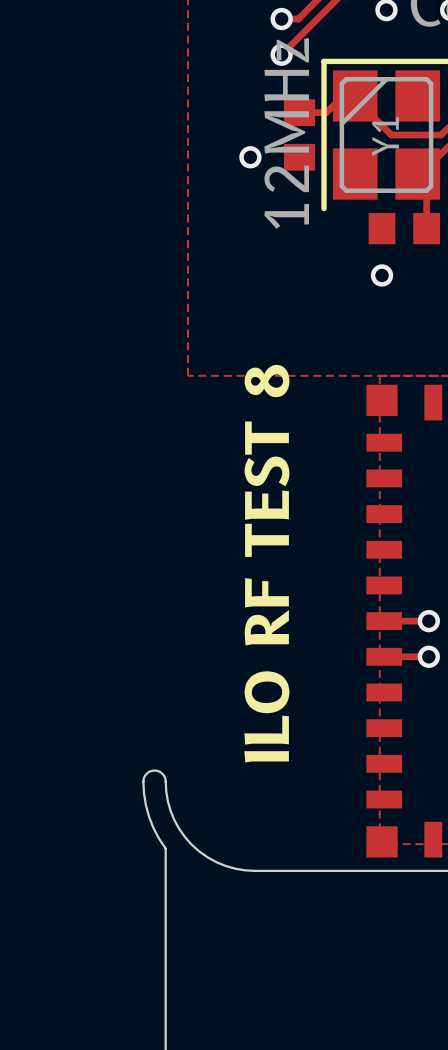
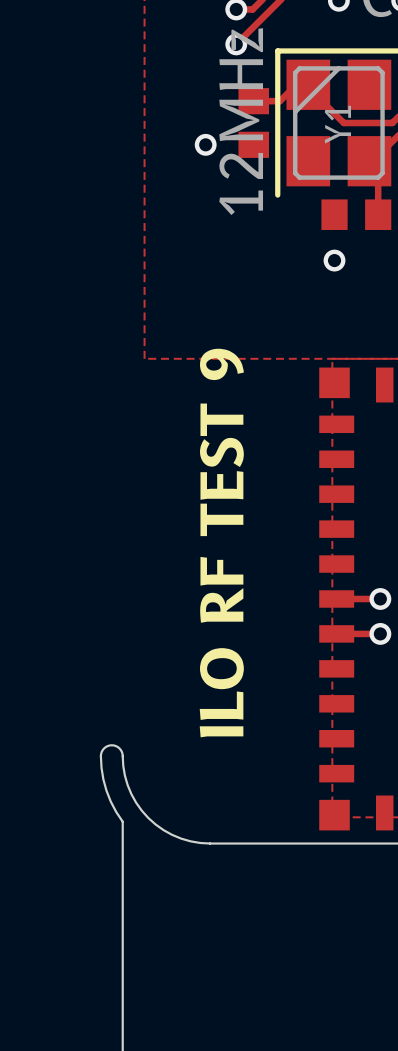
text: ILO RF TEST 8 (266, 563) -> ILO RF TEST 9 (221, 543)

